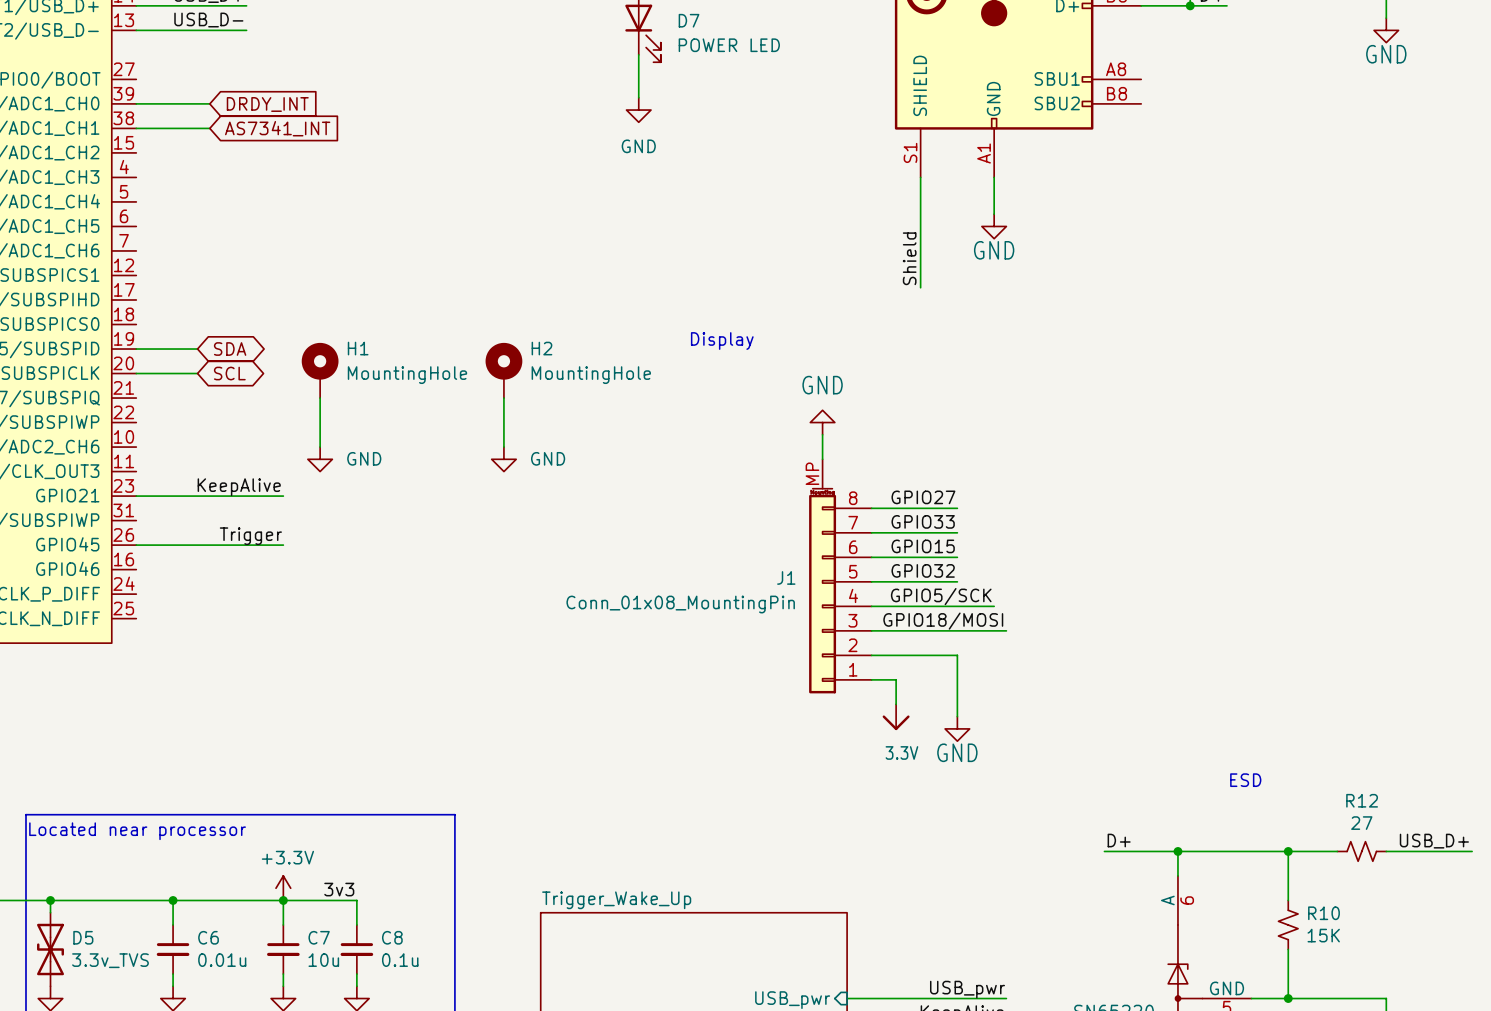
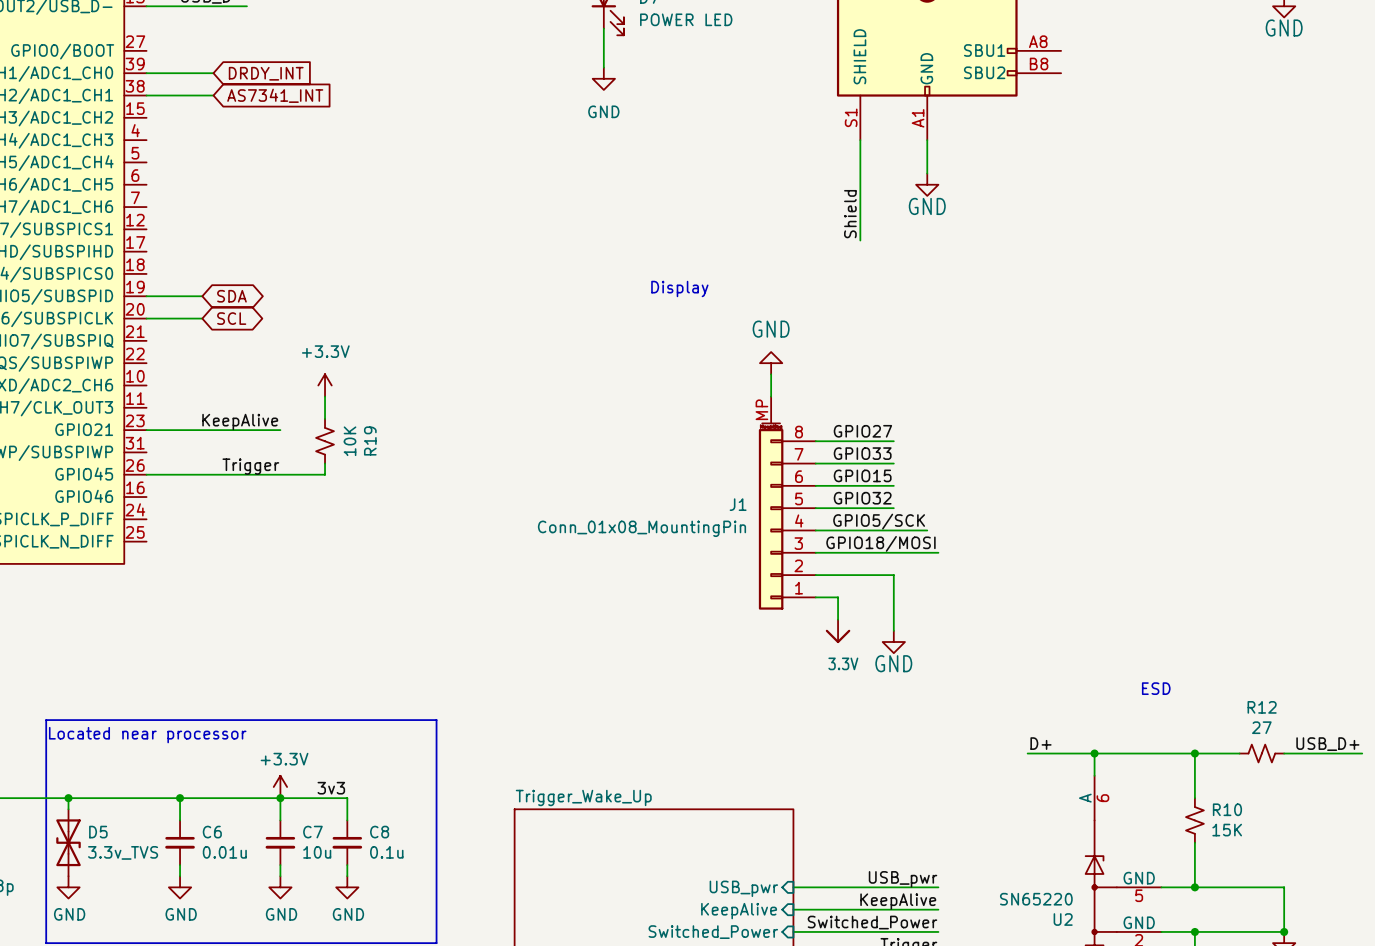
H1: MountingHole (320, 370) -> none
H2: MountingHole (503, 370) -> none
wire: (320, 398) (320, 447) -> none
wire: (503, 398) (503, 447) -> none
power symbol: none -> +3.3V (325, 385)
power symbol: GND (320, 459) -> none
wire: none -> (325, 396) (325, 418)
power symbol: GND (503, 459) -> none
R19: none -> 10K (325, 441)
wire: none -> (325, 463) (325, 474) (280, 474)

